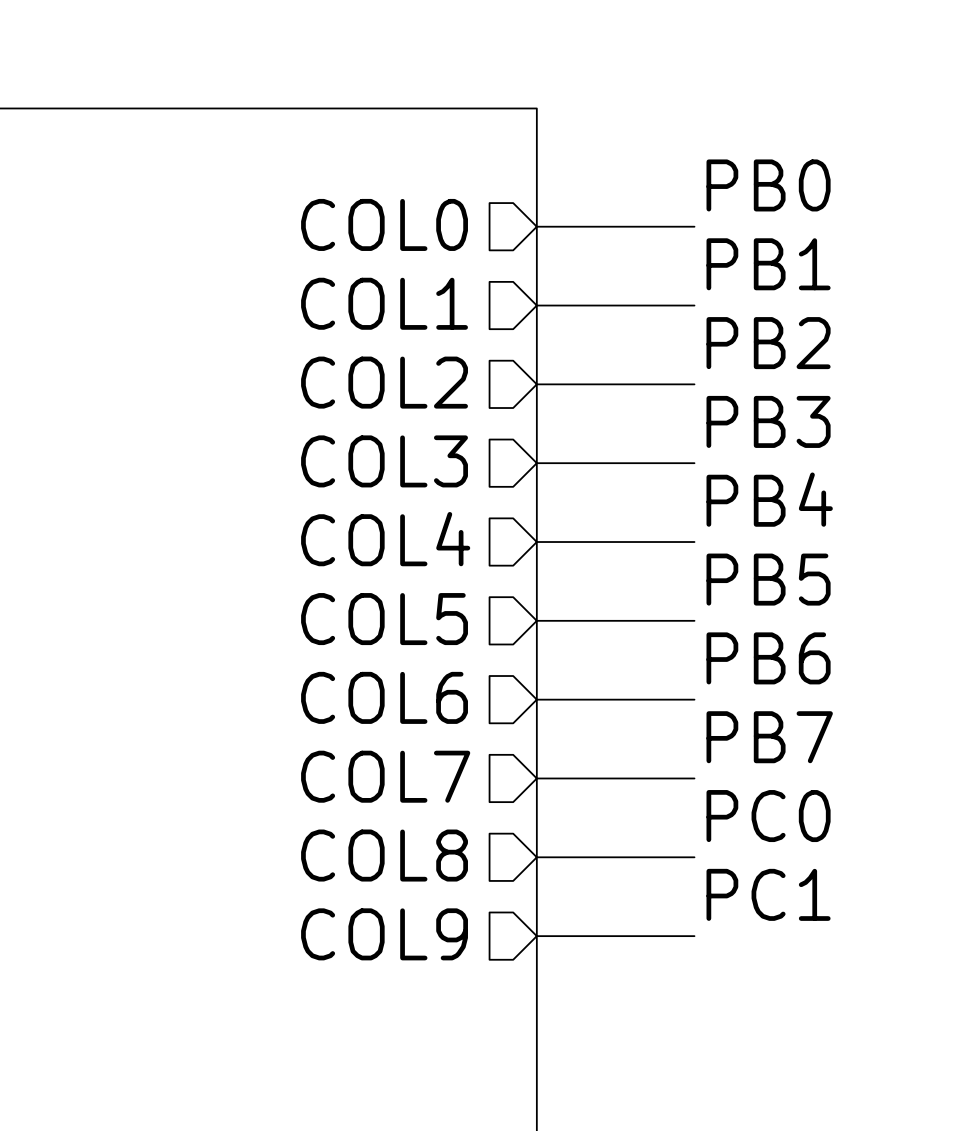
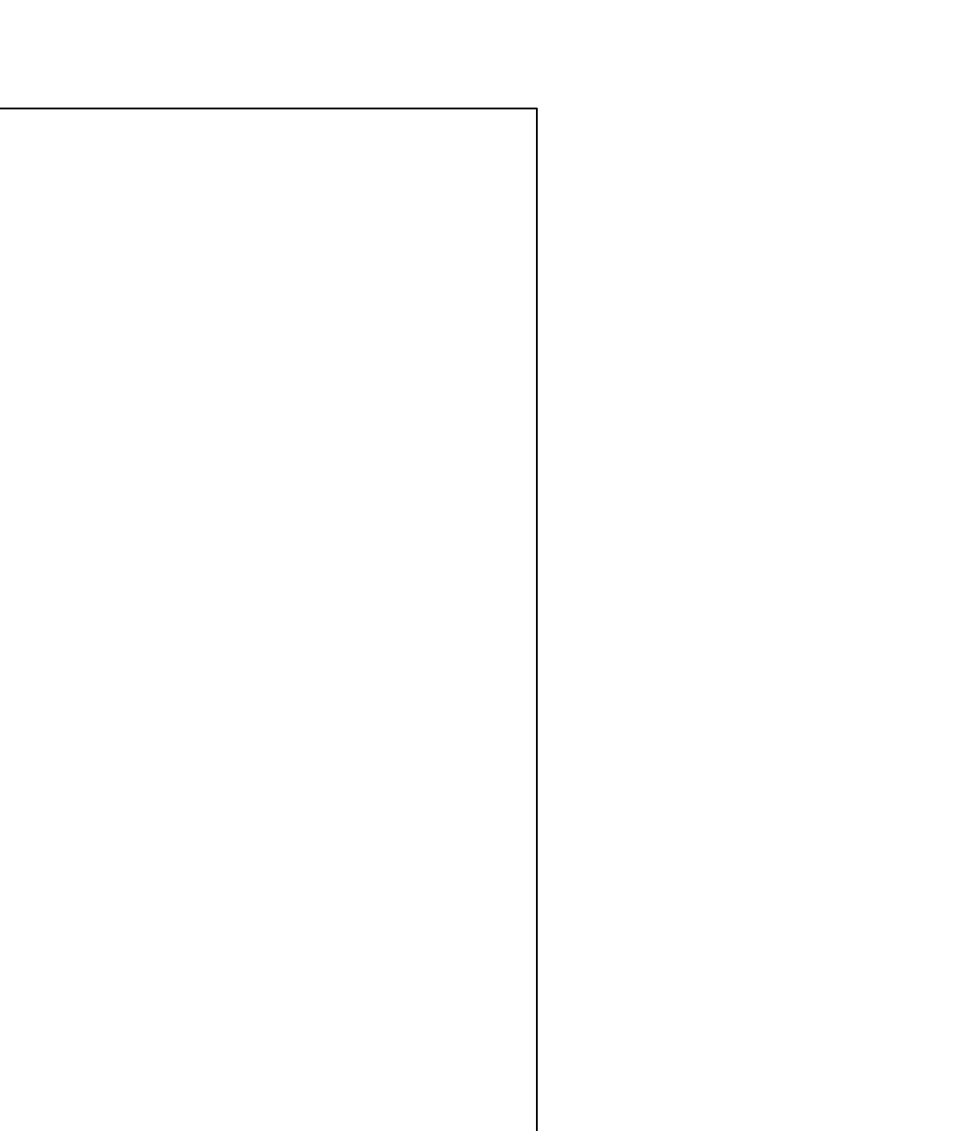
label: PB0 (768, 185) -> none
sheet pin: COL0 (384, 224) -> none
wire: (536, 226) (694, 226) -> none
label: PB1 (768, 264) -> none
sheet pin: COL1 (384, 303) -> none
wire: (536, 305) (694, 305) -> none
label: PB2 (768, 343) -> none
sheet pin: COL2 (384, 382) -> none
wire: (536, 384) (694, 384) -> none
label: PB3 (768, 421) -> none
sheet pin: COL3 (384, 461) -> none
wire: (536, 463) (694, 463) -> none
label: PB4 (769, 499) -> none
sheet pin: COL4 (385, 539) -> none
wire: (536, 542) (694, 542) -> none
label: PB5 (768, 579) -> none
sheet pin: COL5 (384, 619) -> none
wire: (536, 620) (694, 620) -> none
label: PB6 (768, 658) -> none
sheet pin: COL6 (384, 697) -> none
wire: (536, 699) (694, 699) -> none
label: PB7 (769, 737) -> none
sheet pin: COL7 (385, 776) -> none
wire: (536, 778) (694, 778) -> none
label: PC0 (768, 816) -> none
sheet pin: COL8 (384, 855) -> none
wire: (536, 857) (694, 857) -> none
label: PC1 (768, 894) -> none
sheet pin: COL9 (384, 934) -> none
wire: (536, 936) (694, 936) -> none

